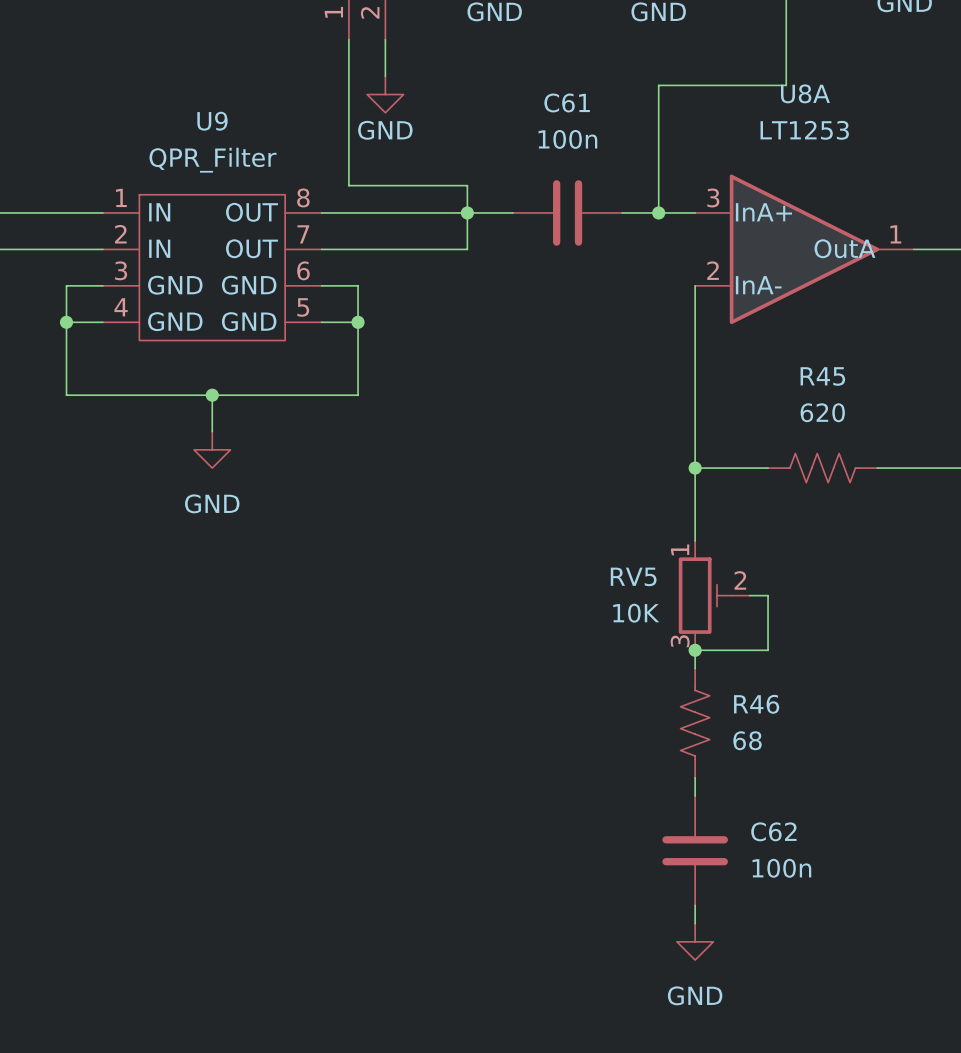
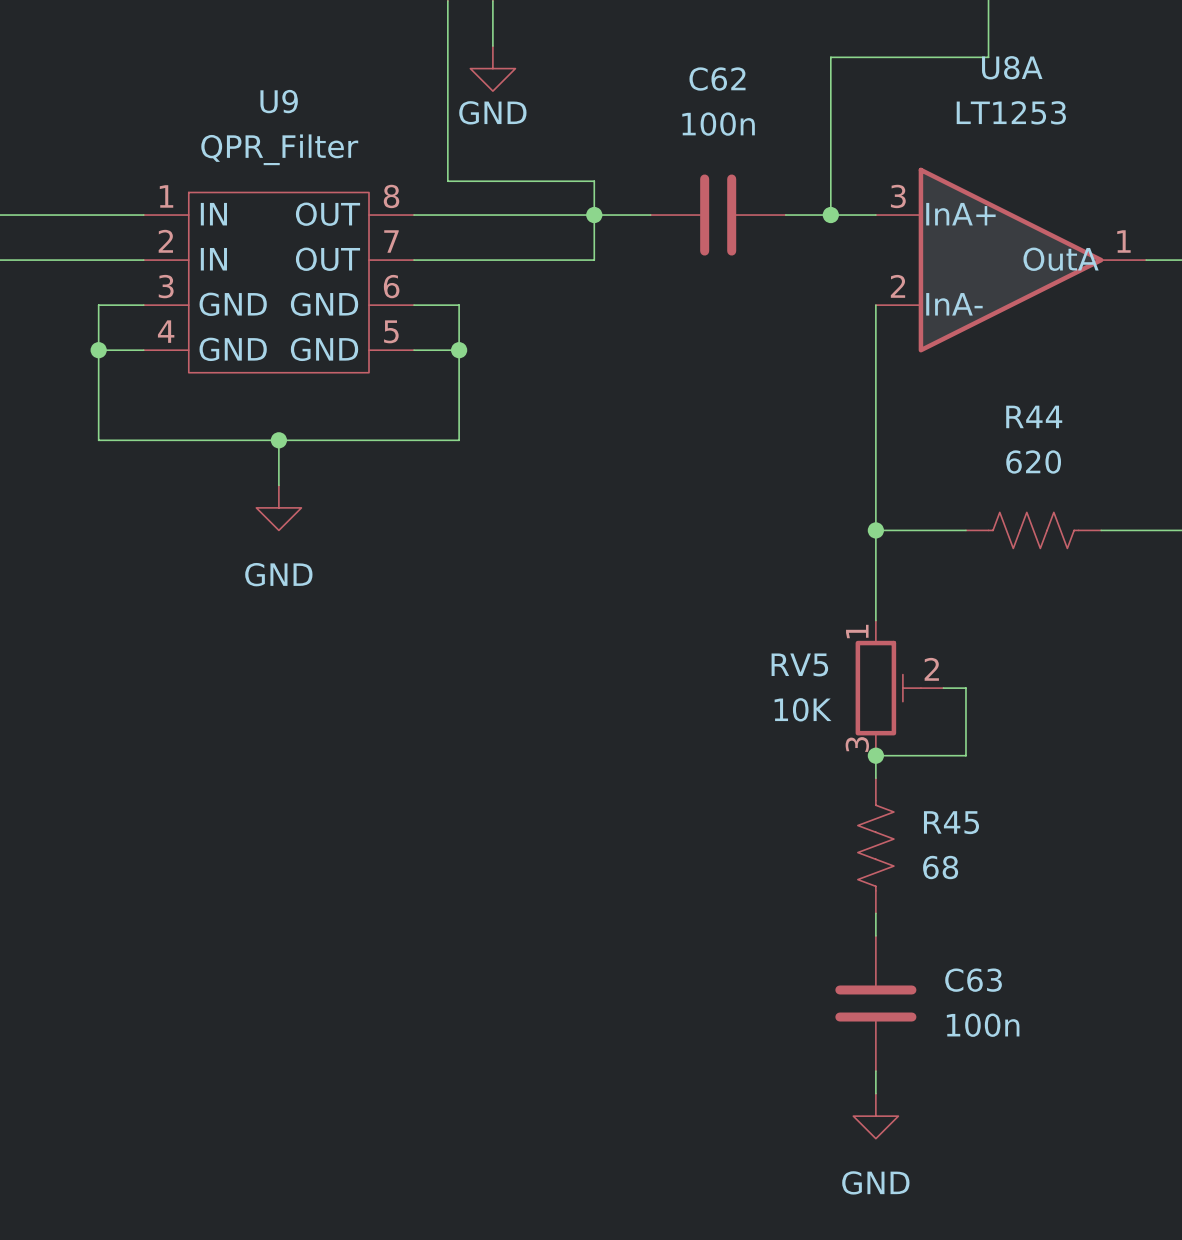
C61 name: C61 (567, 102) -> C62 (717, 79)
R45 name: R45 (822, 376) -> R44 (1034, 416)
R46 name: R46 (756, 704) -> R45 (951, 822)
C62 name: C62 (773, 831) -> C63 (973, 980)

